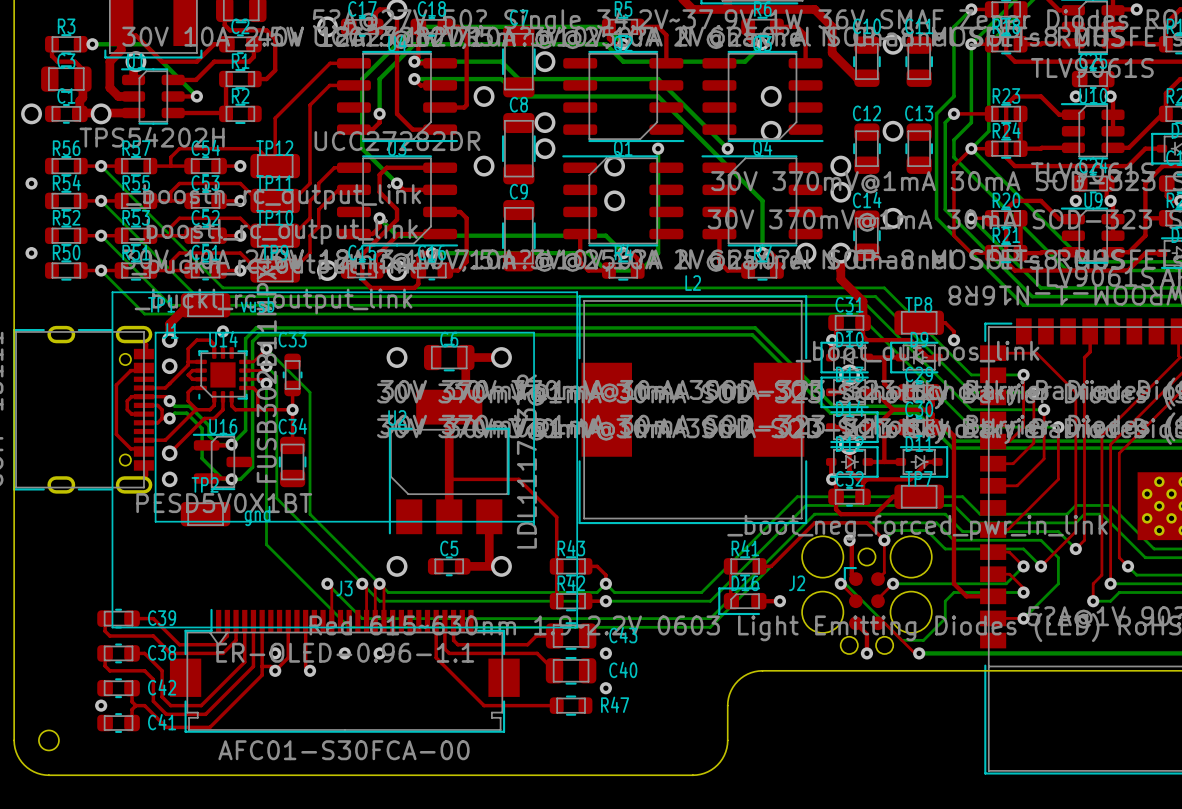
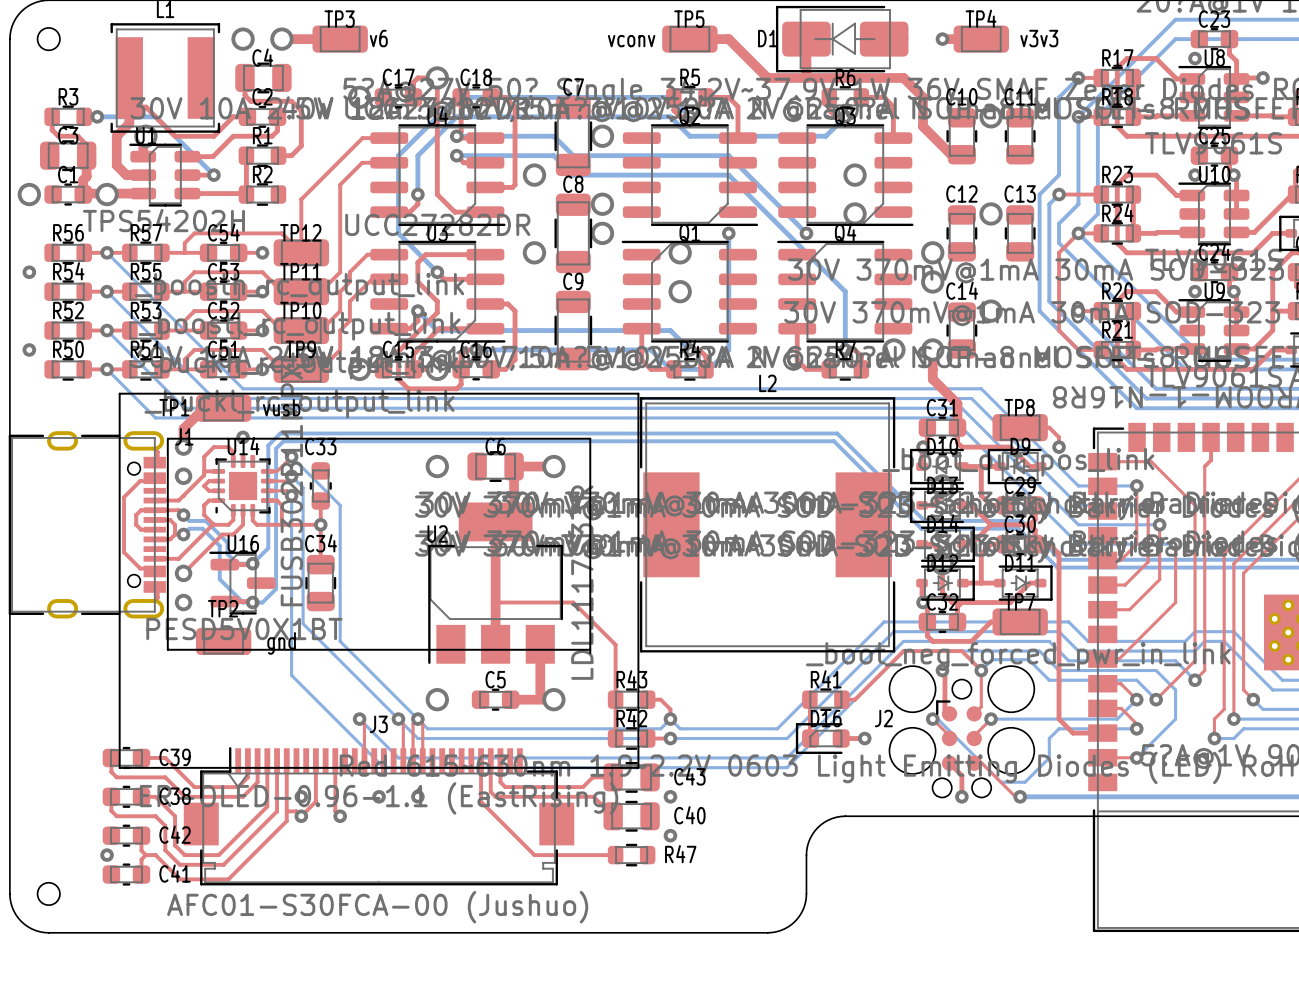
drawing shape: [111, 291, 579, 663] -> [118, 392, 640, 815]
J3 value: AFC01-S30FCA-00 (343, 750) -> AFC01-S30FCA-00 (Jushuo) (377, 907)

